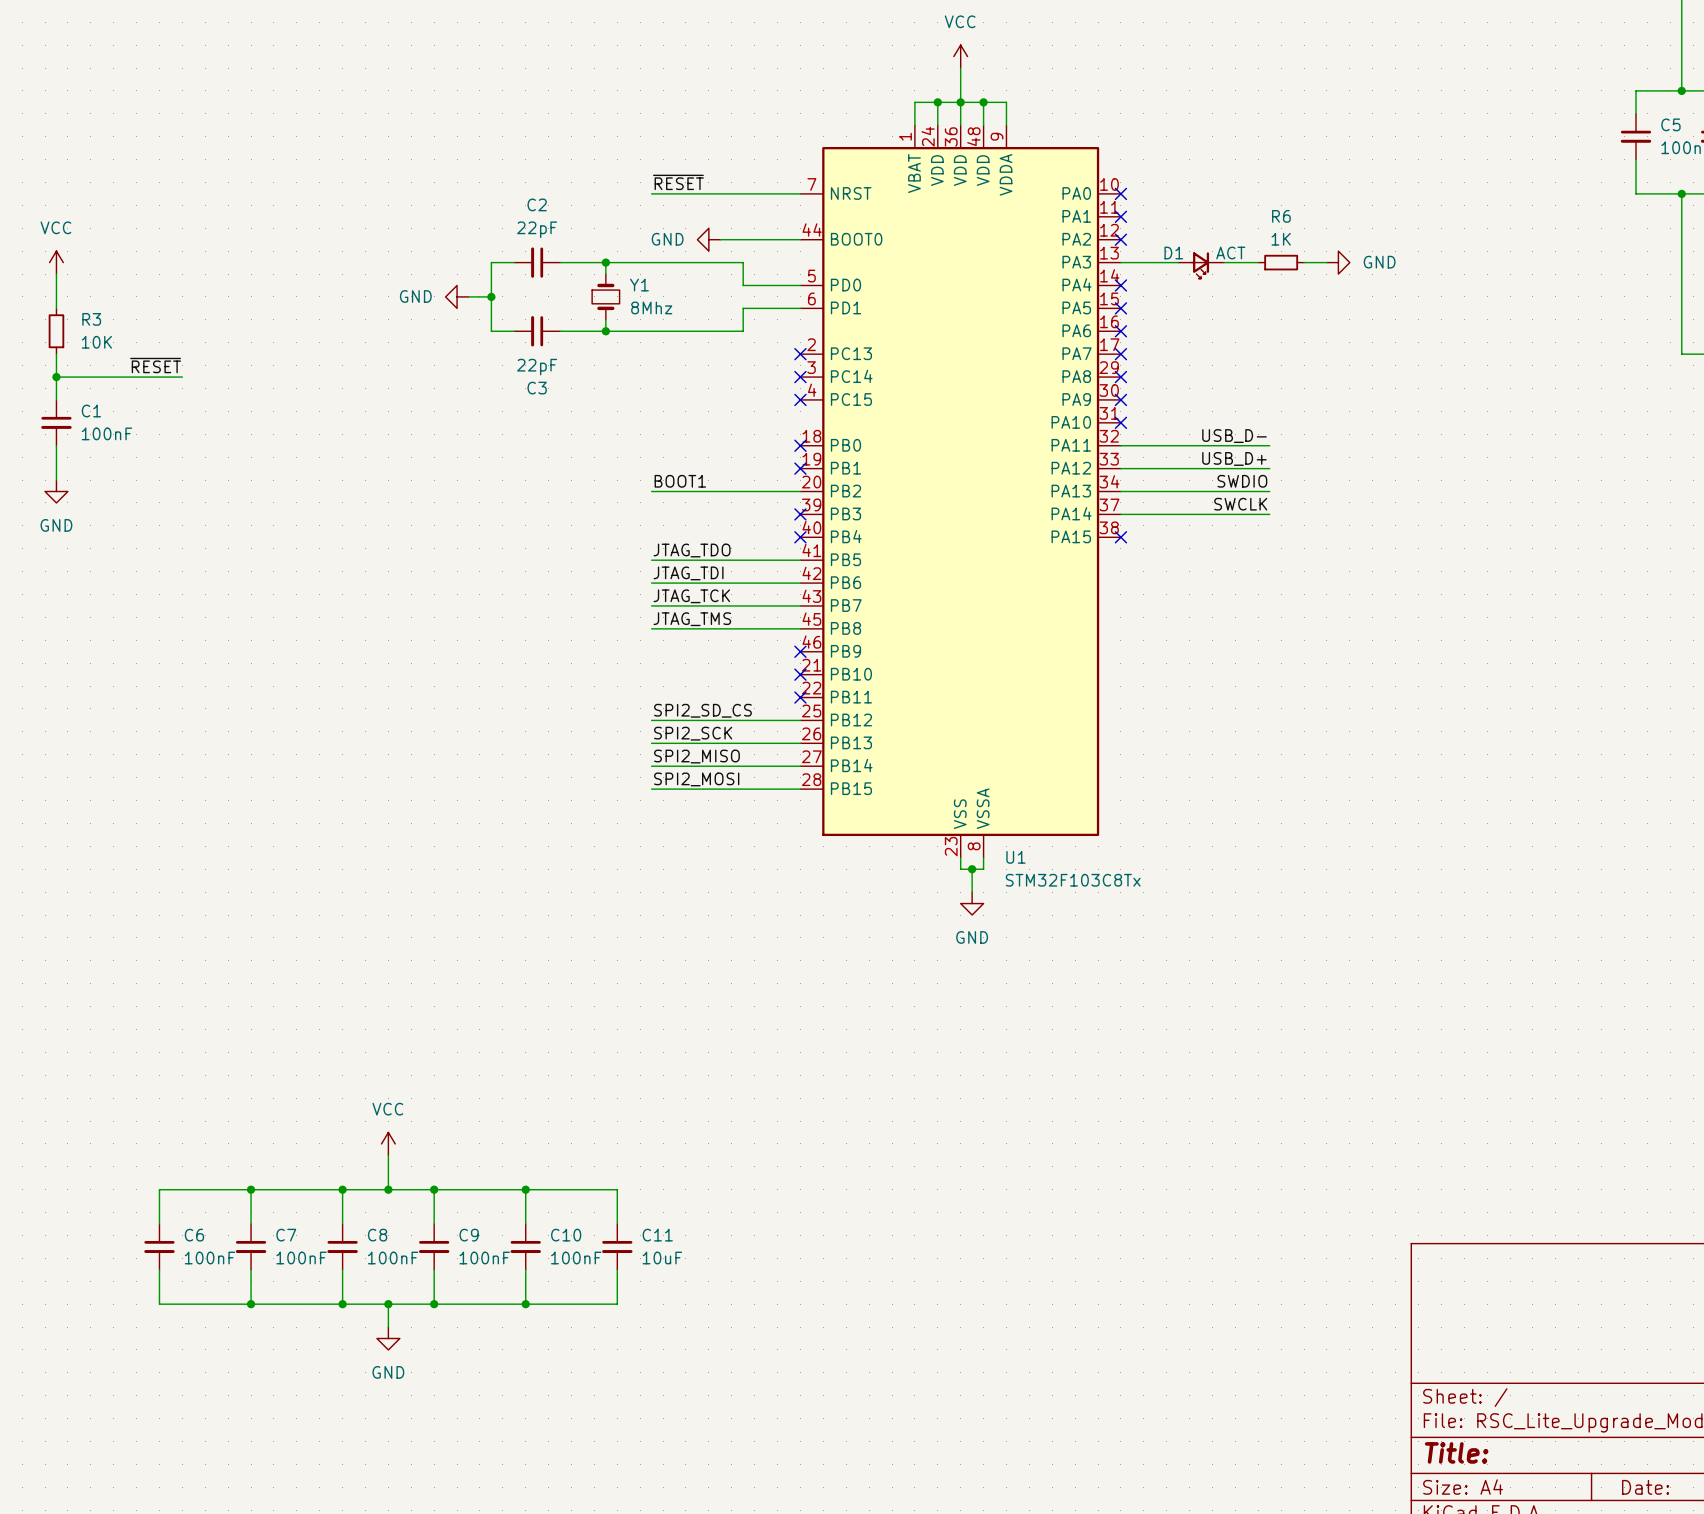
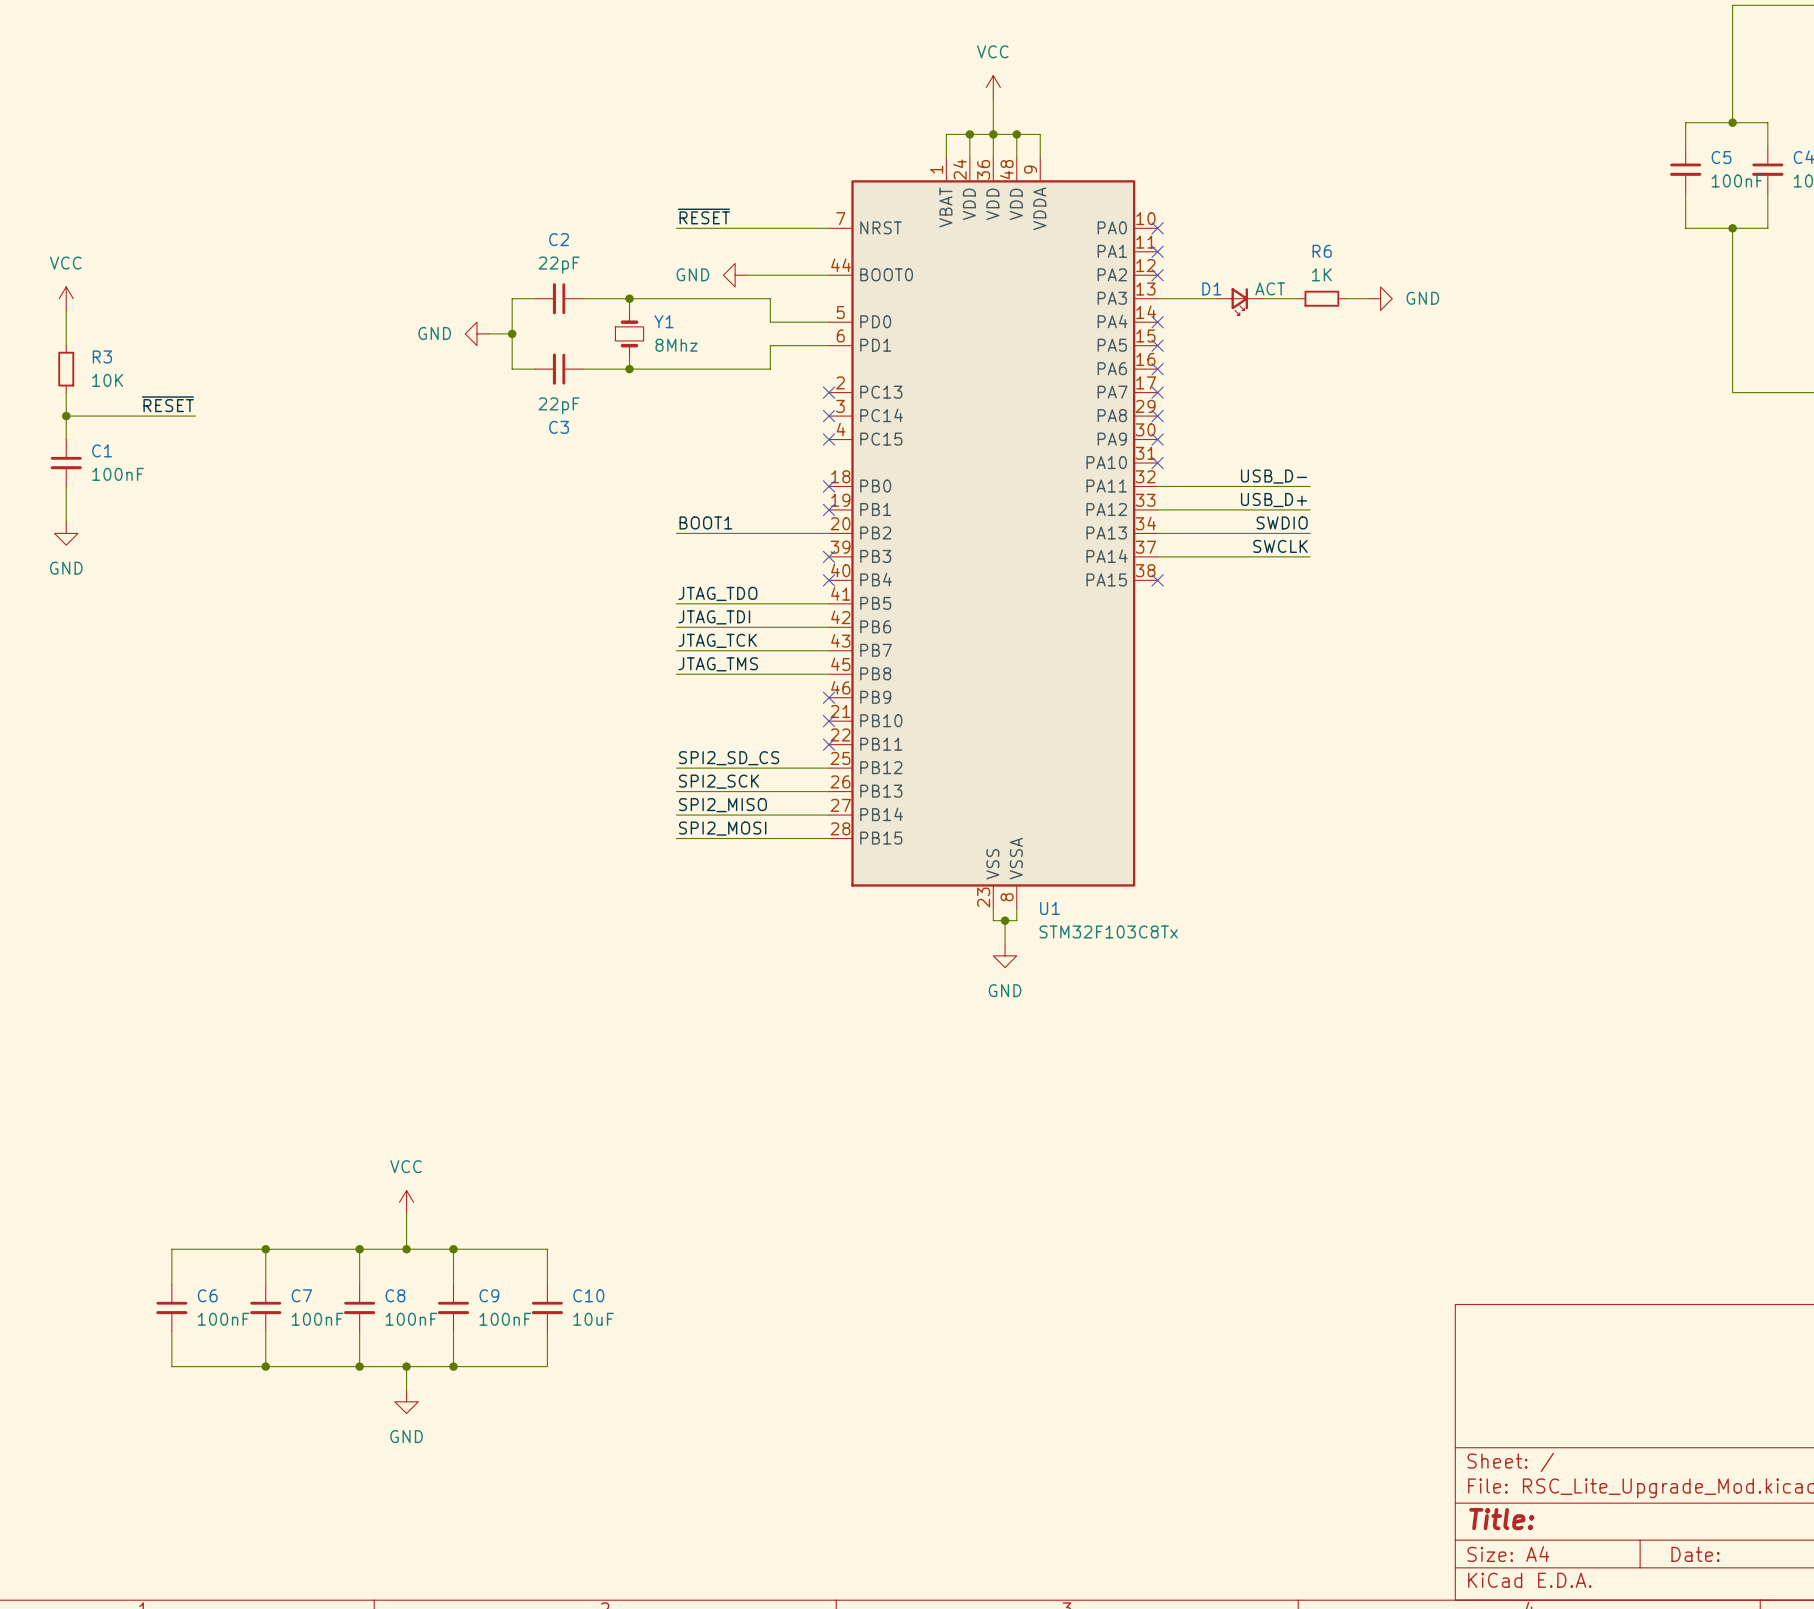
wire: (525, 1189) (617, 1189) (617, 1224) -> none
junction: (525, 1189) -> none
C11: 10uF (617, 1246) -> none
C10 value: 100nF (576, 1258) -> 10uF (593, 1319)
wire: (617, 1269) (617, 1304) (525, 1304) -> none
junction: (525, 1304) -> none

